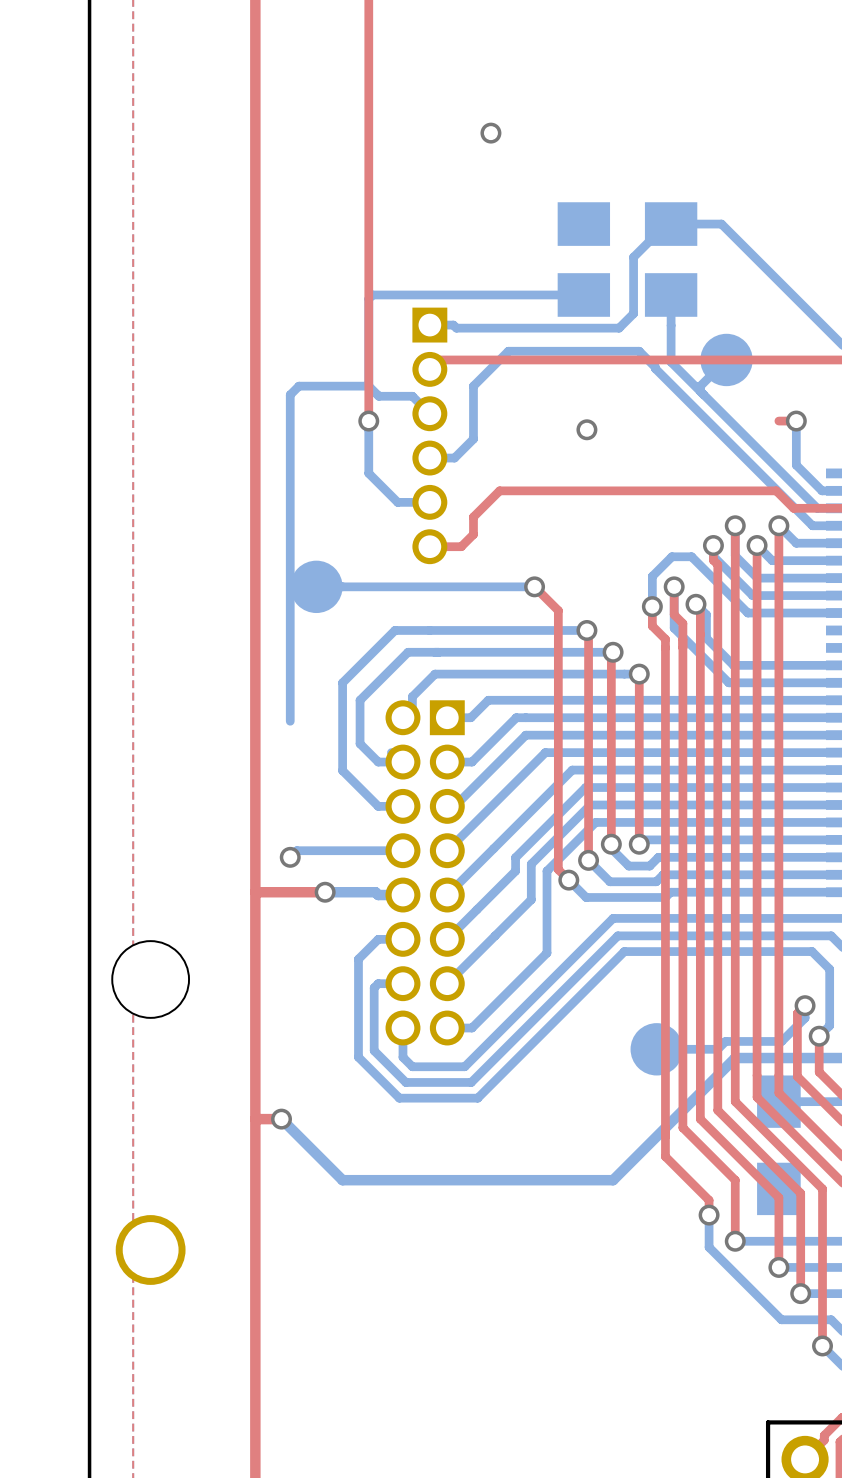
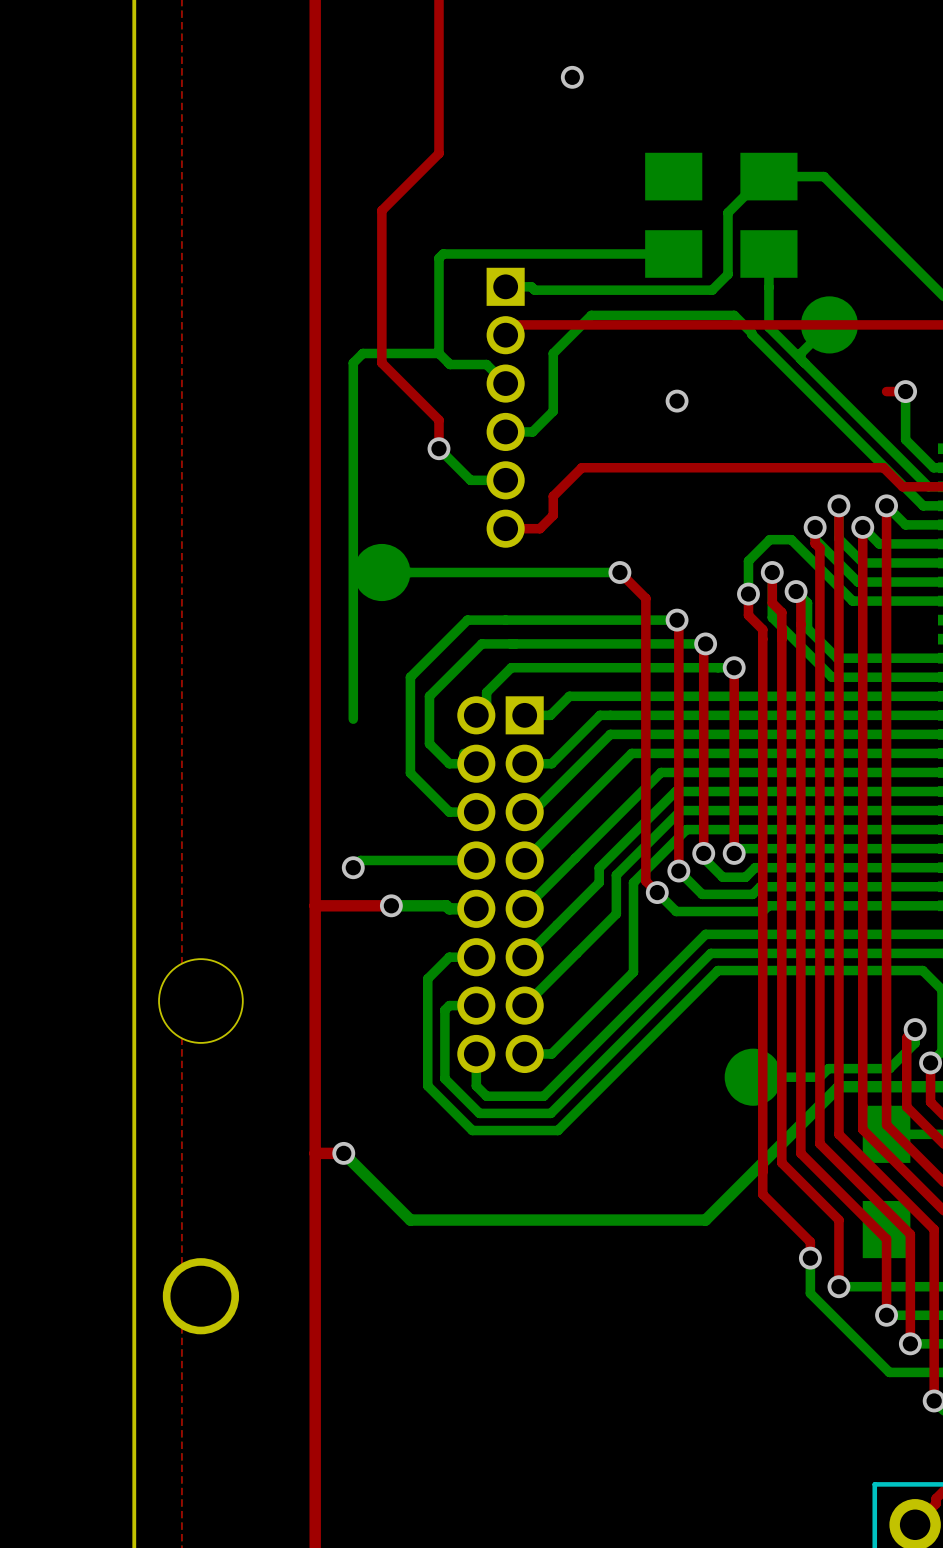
top track: (368, 202) (368, 421) -> (438, 153) (381, 210) (381, 363) (438, 420) (438, 448)
bottom track: (368, 421) (368, 473) -> none
via position: (368, 421) -> (438, 448)

